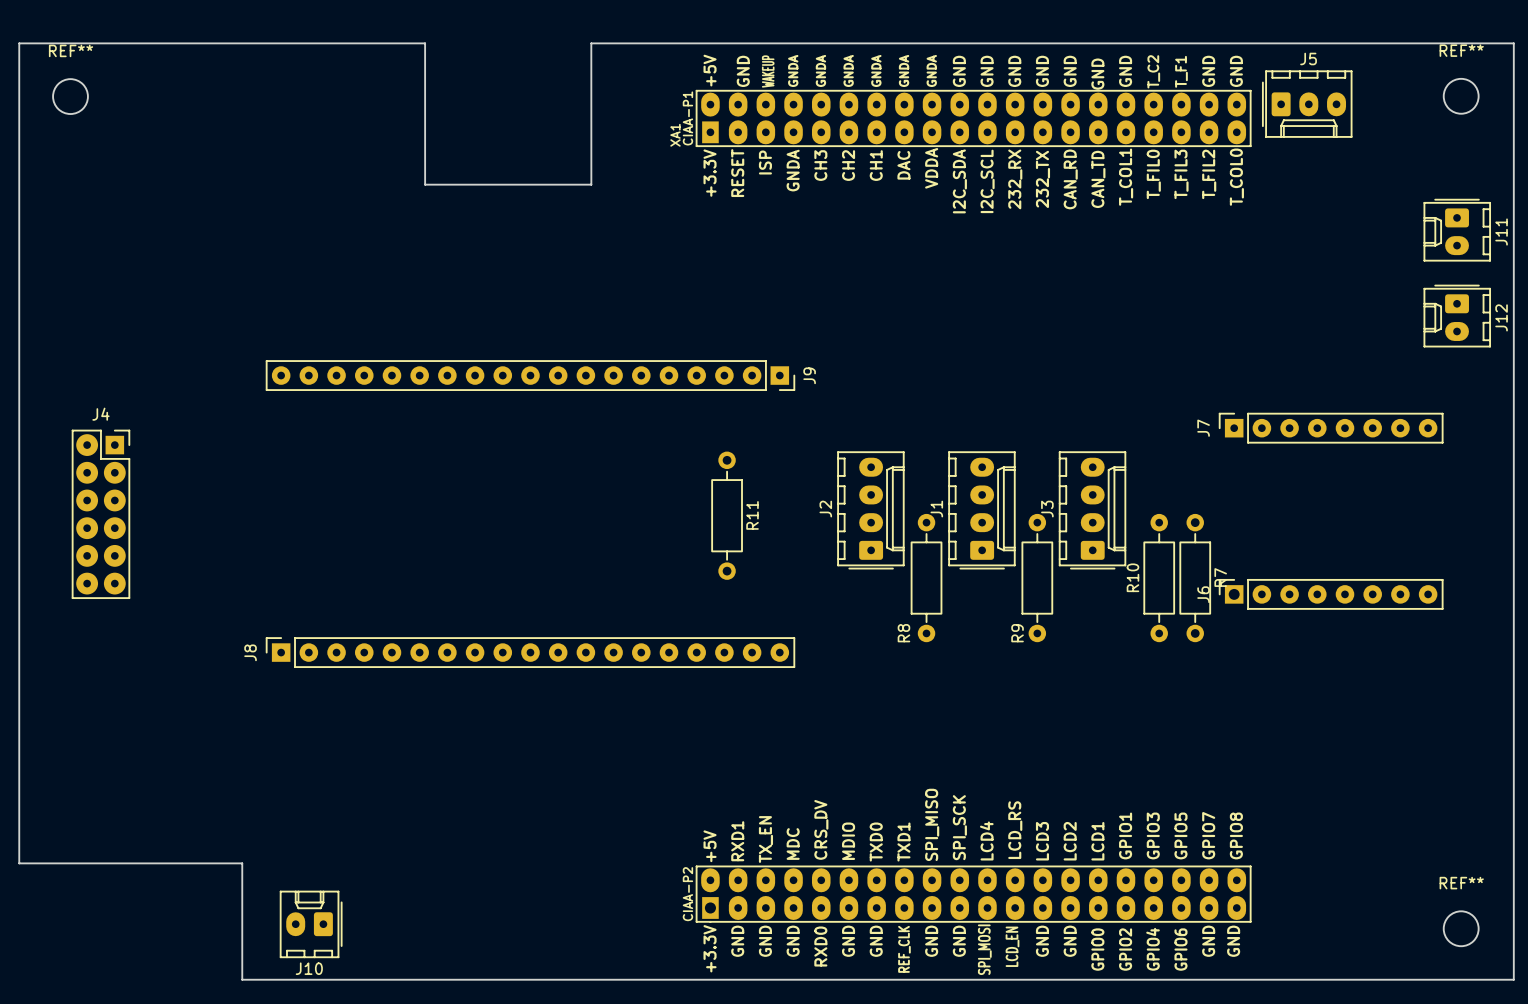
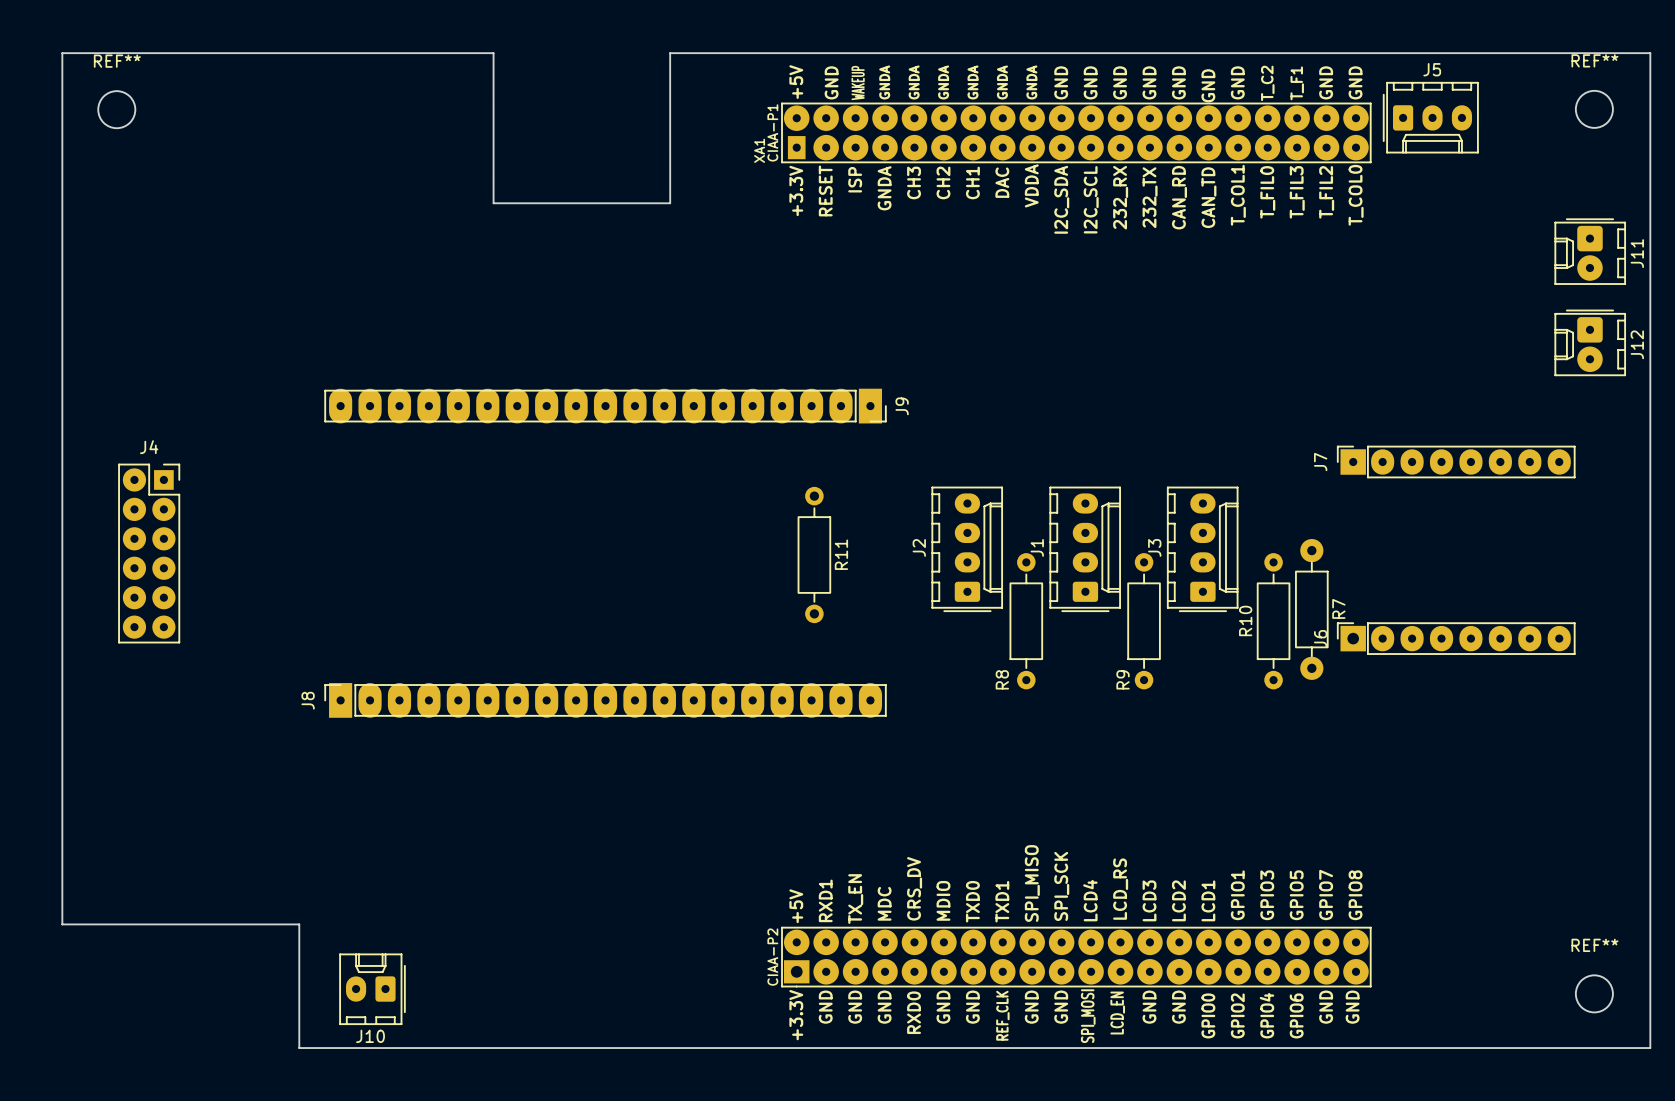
XA1 footprint: [695, 89, 1252, 923] -> [781, 102, 1372, 988]
J11 footprint: [1423, 199, 1491, 262] -> [1554, 218, 1626, 285]
J12 footprint: [1423, 284, 1491, 348] -> [1554, 309, 1626, 376]
J9 footprint: [265, 360, 795, 391] -> [324, 388, 887, 424]
J7 footprint: [1219, 413, 1444, 444] -> [1337, 445, 1576, 479]
R7 footprint: [1179, 513, 1211, 643] -> [1295, 539, 1329, 680]
J6 footprint: [1219, 579, 1444, 610] -> [1337, 622, 1576, 655]
J8 footprint: [265, 637, 795, 668] -> [324, 683, 887, 718]

